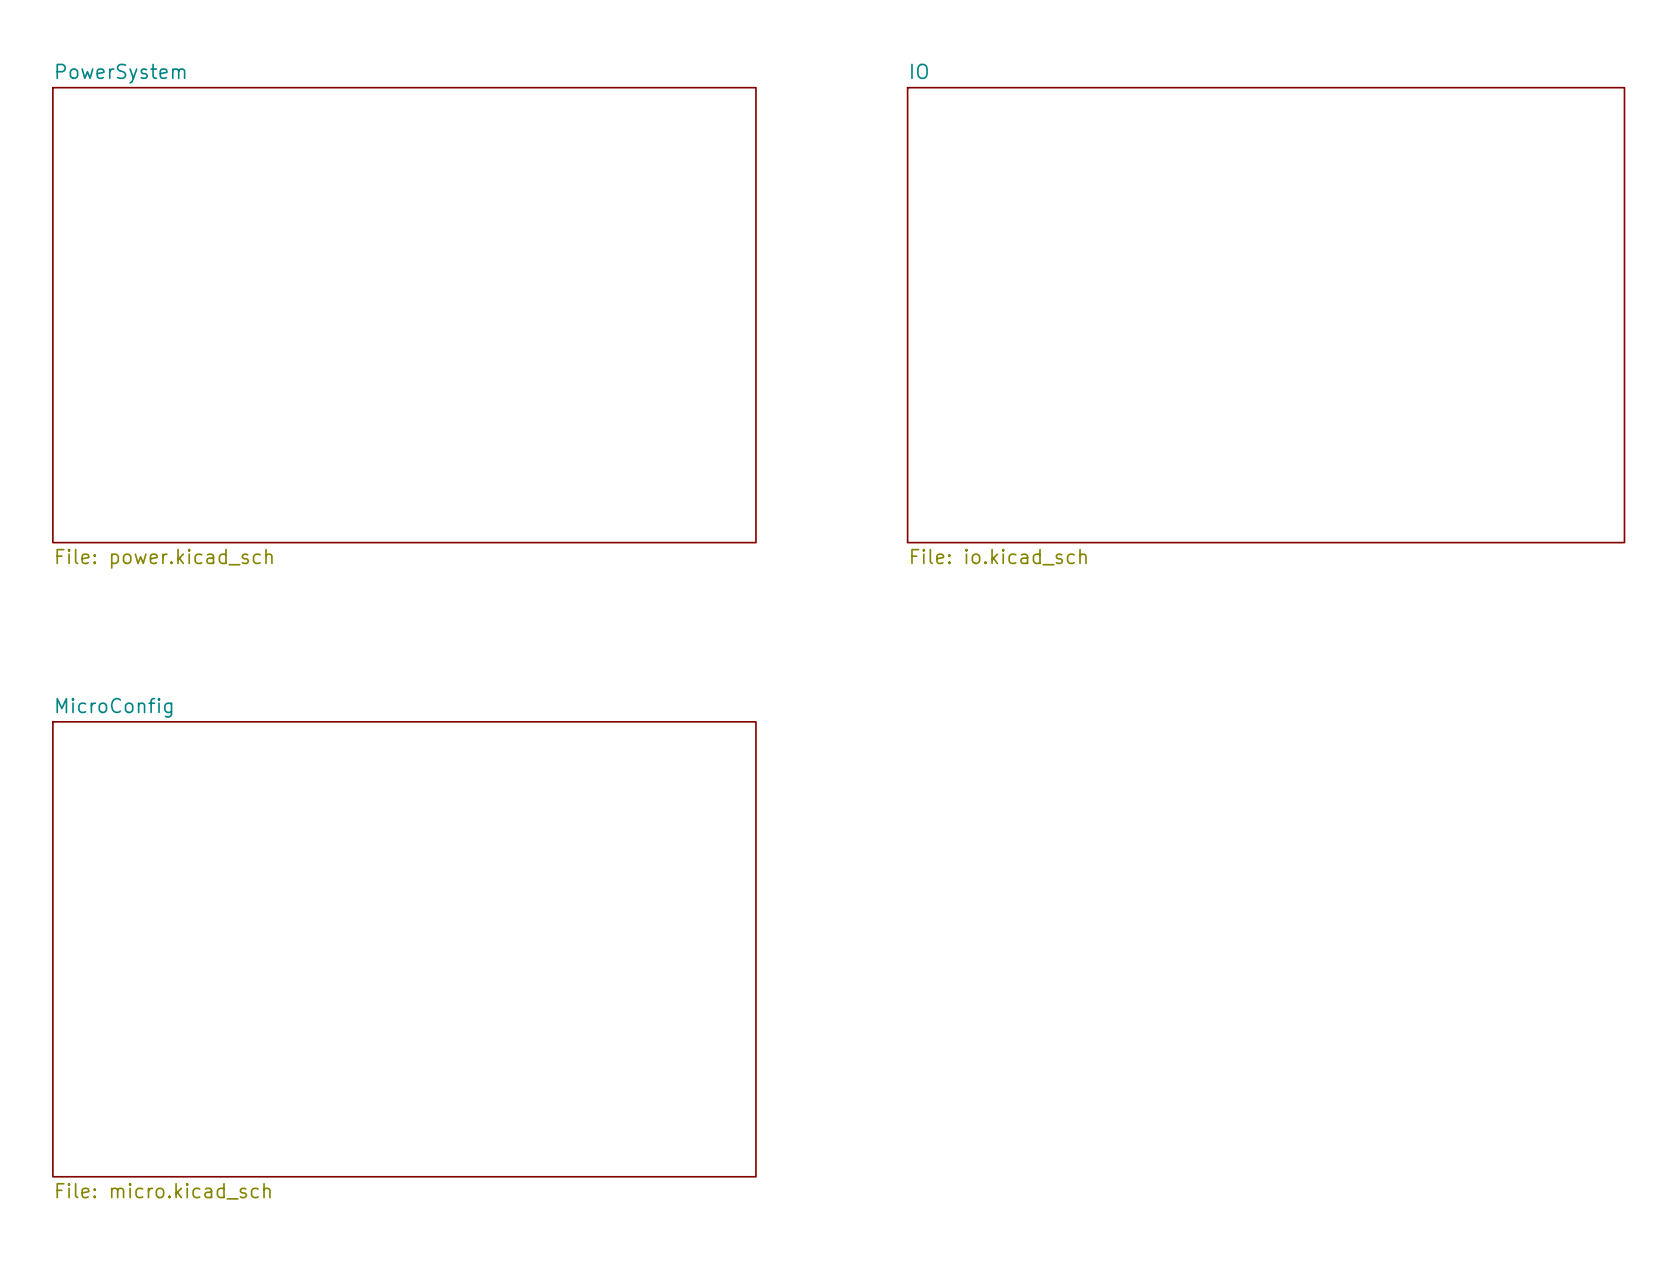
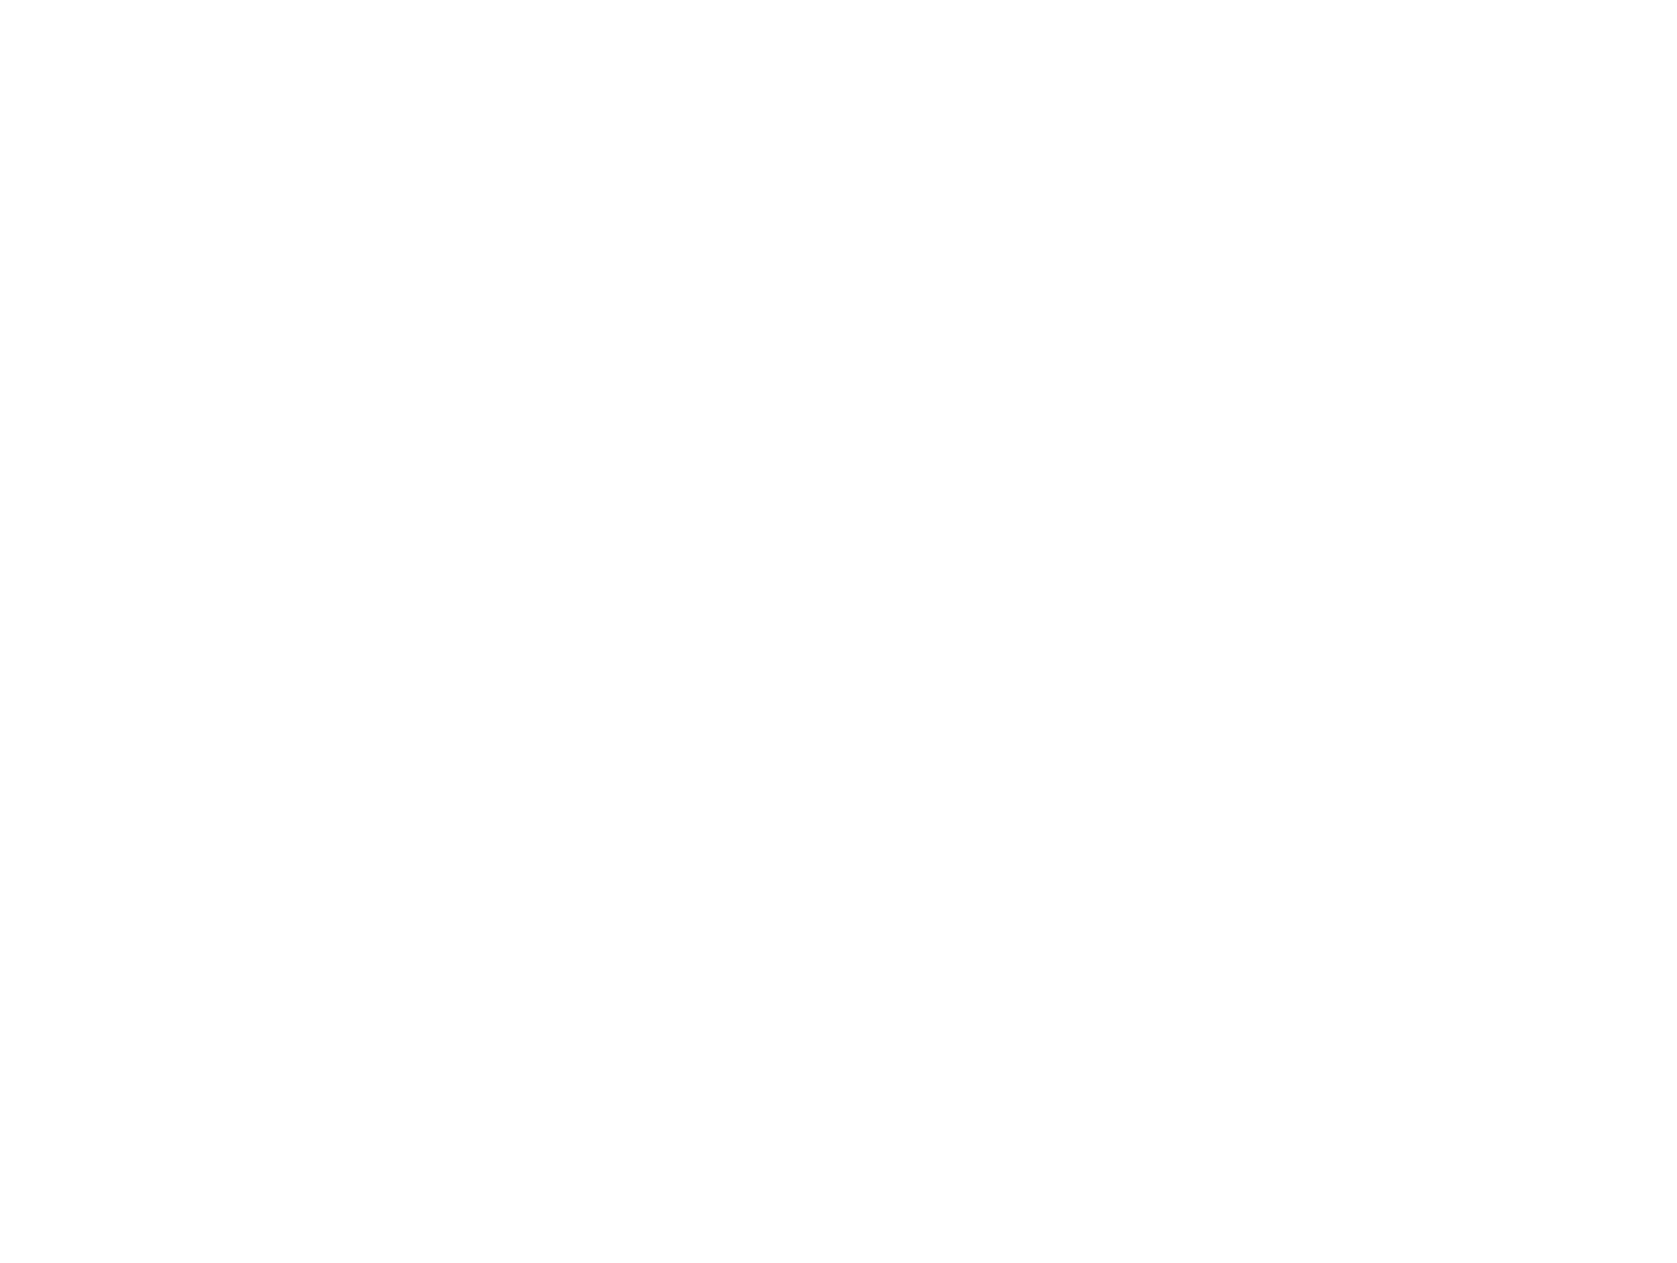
sheet PowerSystem: File: power.kicad_sch (404, 315) -> none
sheet IO: File: io.kicad_sch (1266, 315) -> none
sheet MicroConfig: File: micro.kicad_sch (404, 949) -> none

